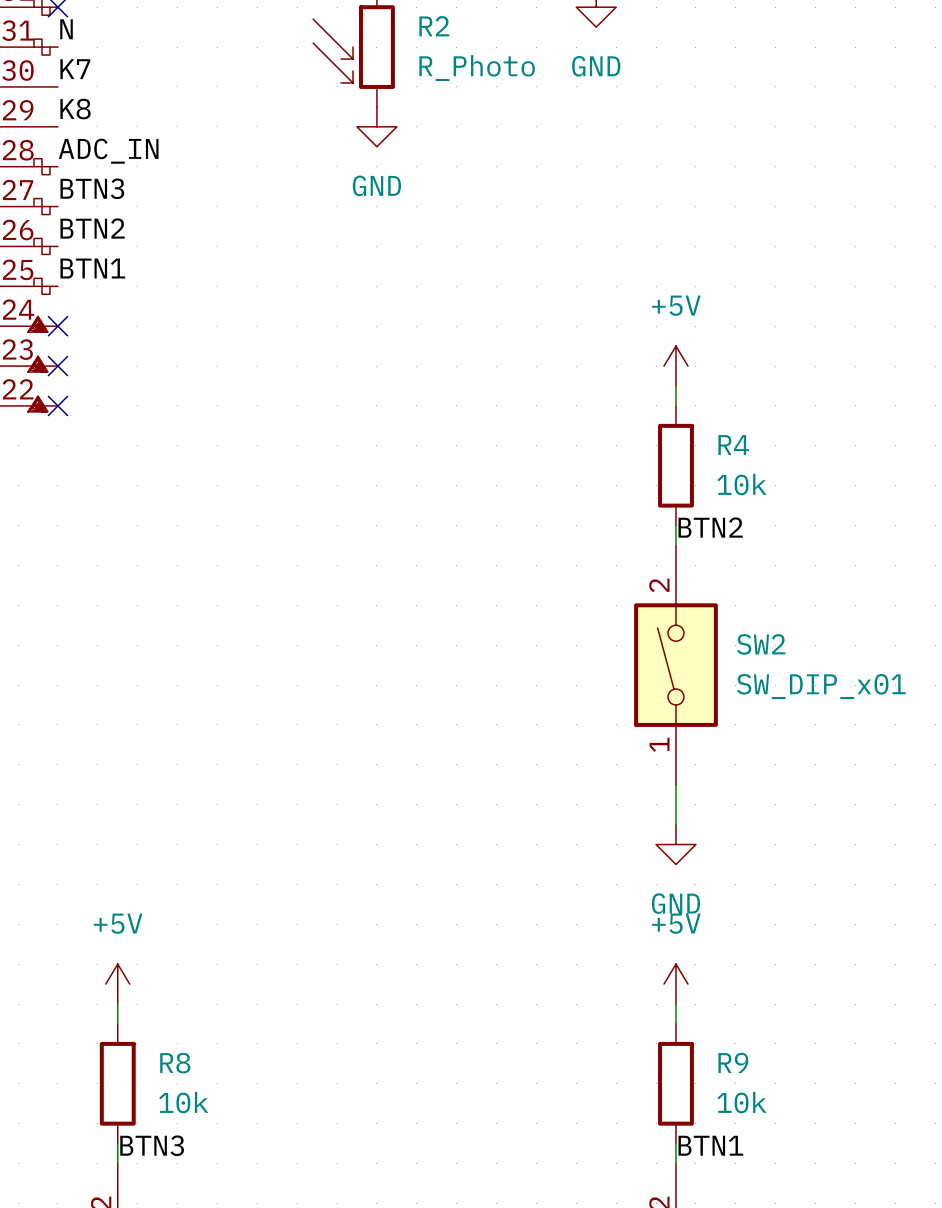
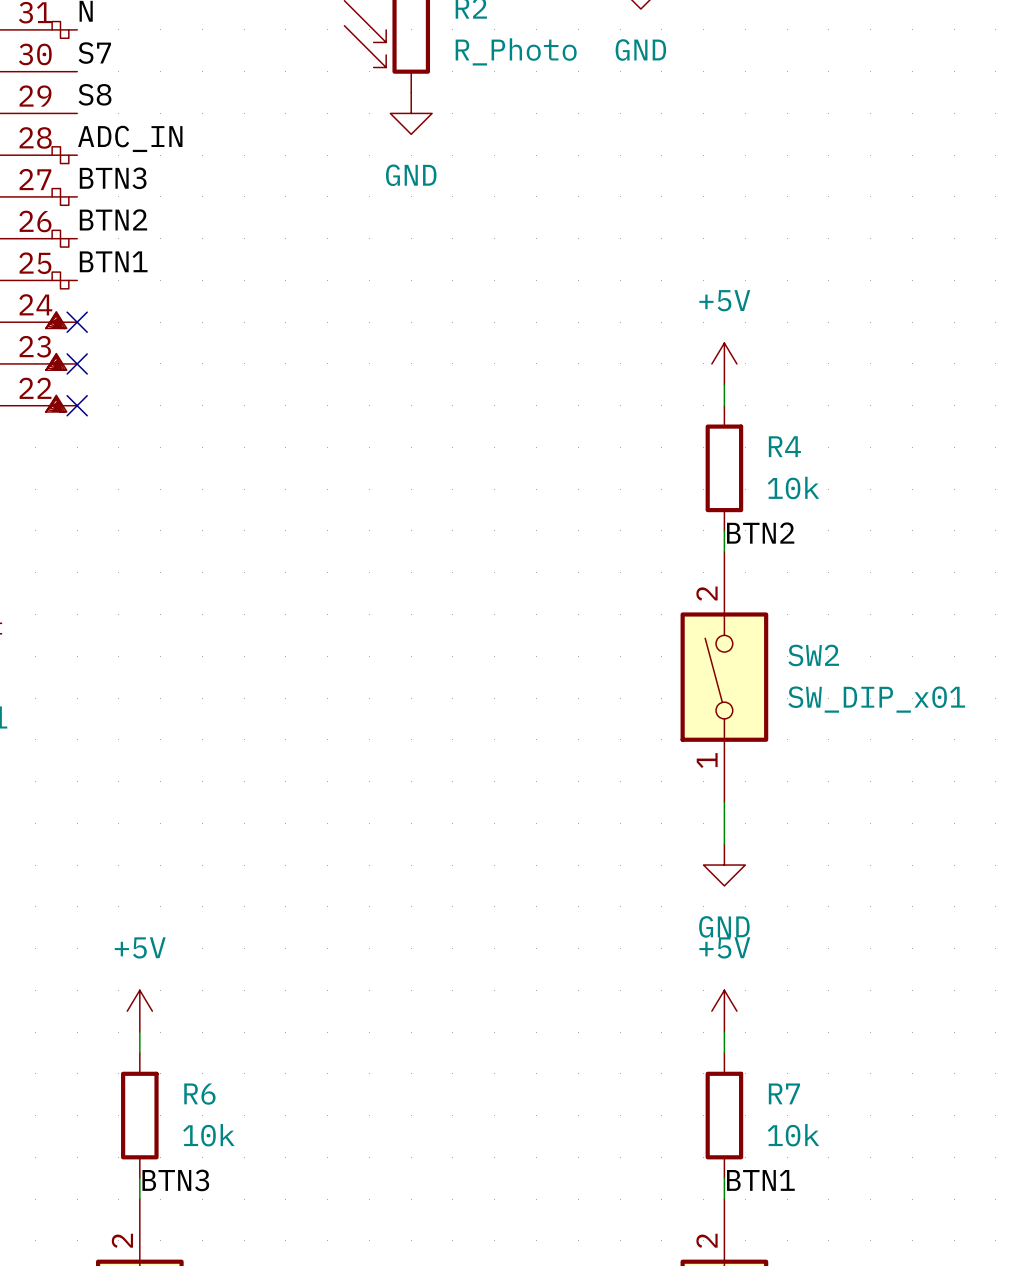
label: K7 (75, 69) -> S7 (94, 53)
label: K8 (75, 109) -> S8 (94, 94)
R9 name: R9 (733, 1062) -> R7 (784, 1093)
R8 name: R8 (175, 1063) -> R6 (199, 1094)

